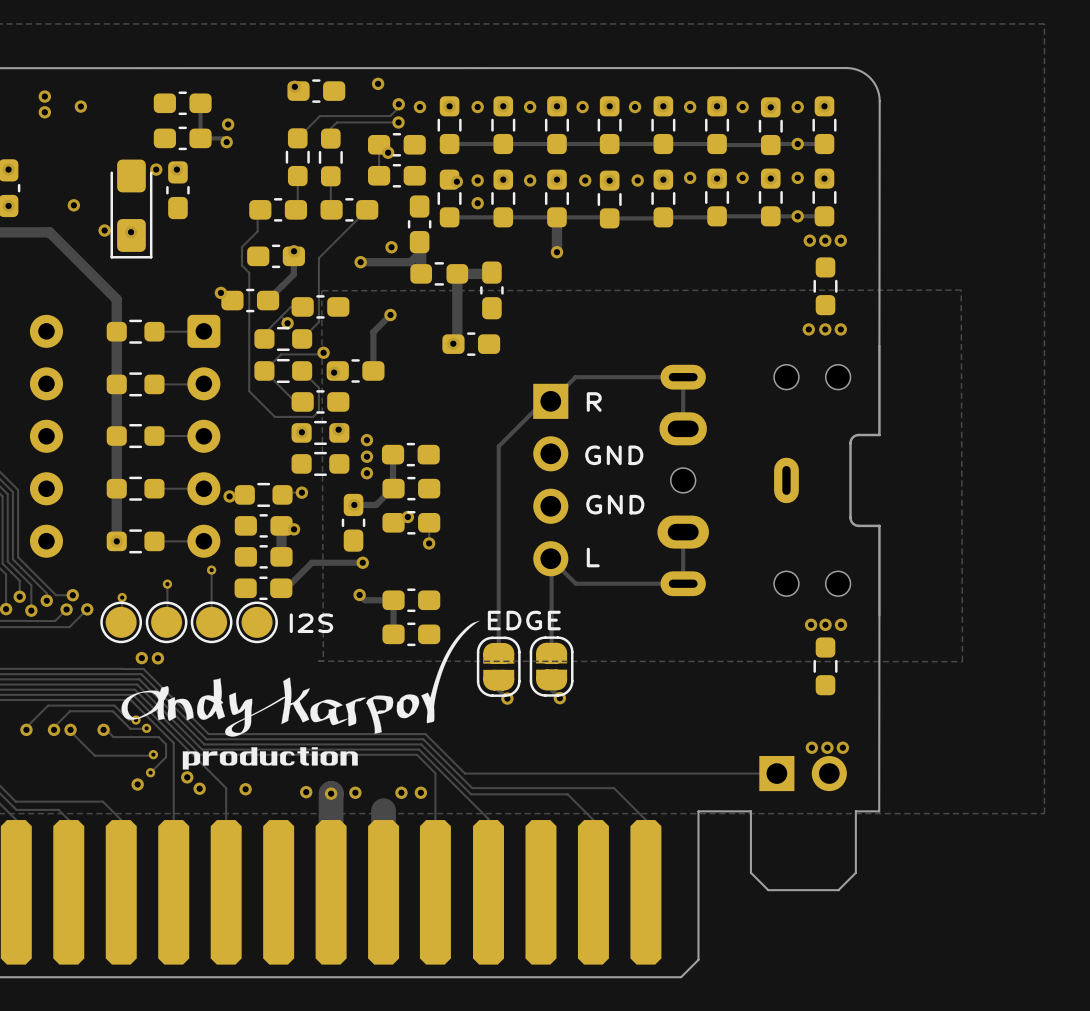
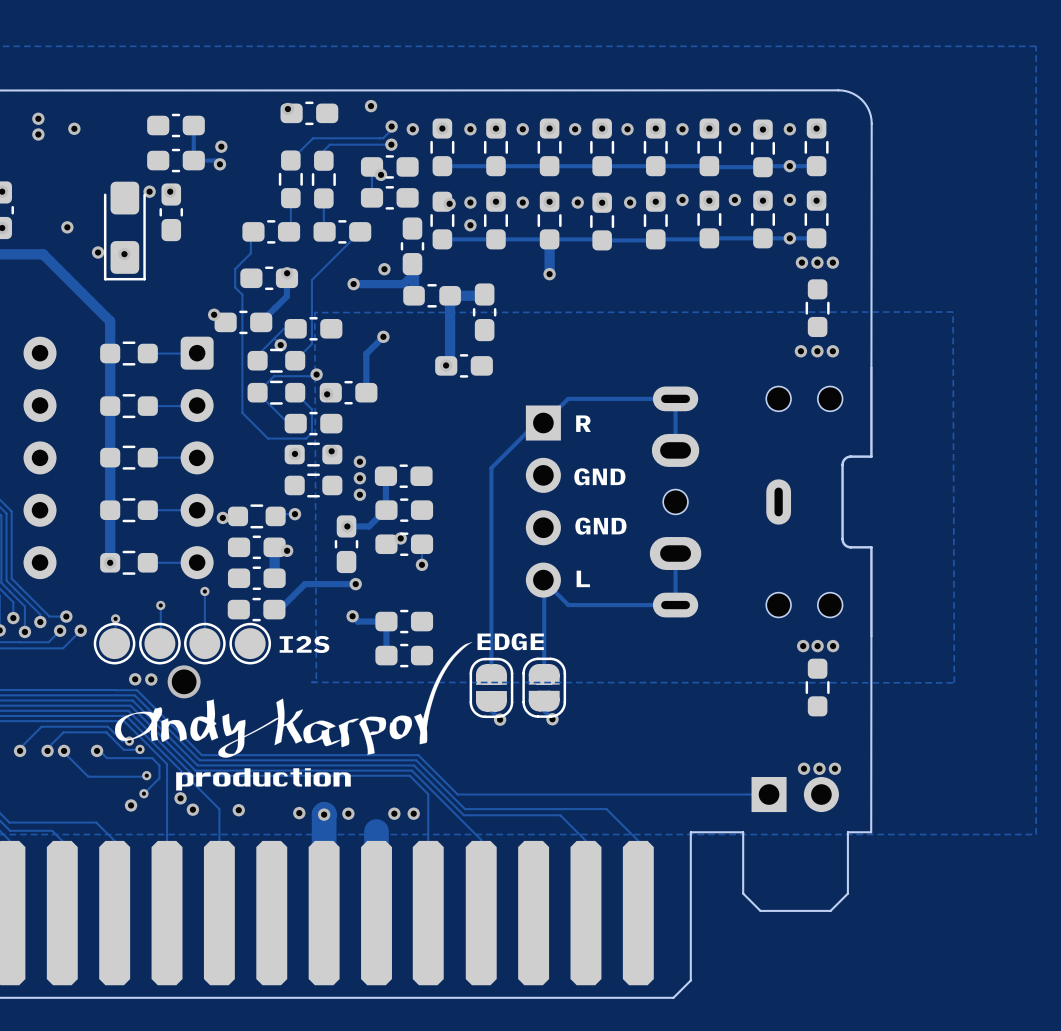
via: none -> (184, 681)

